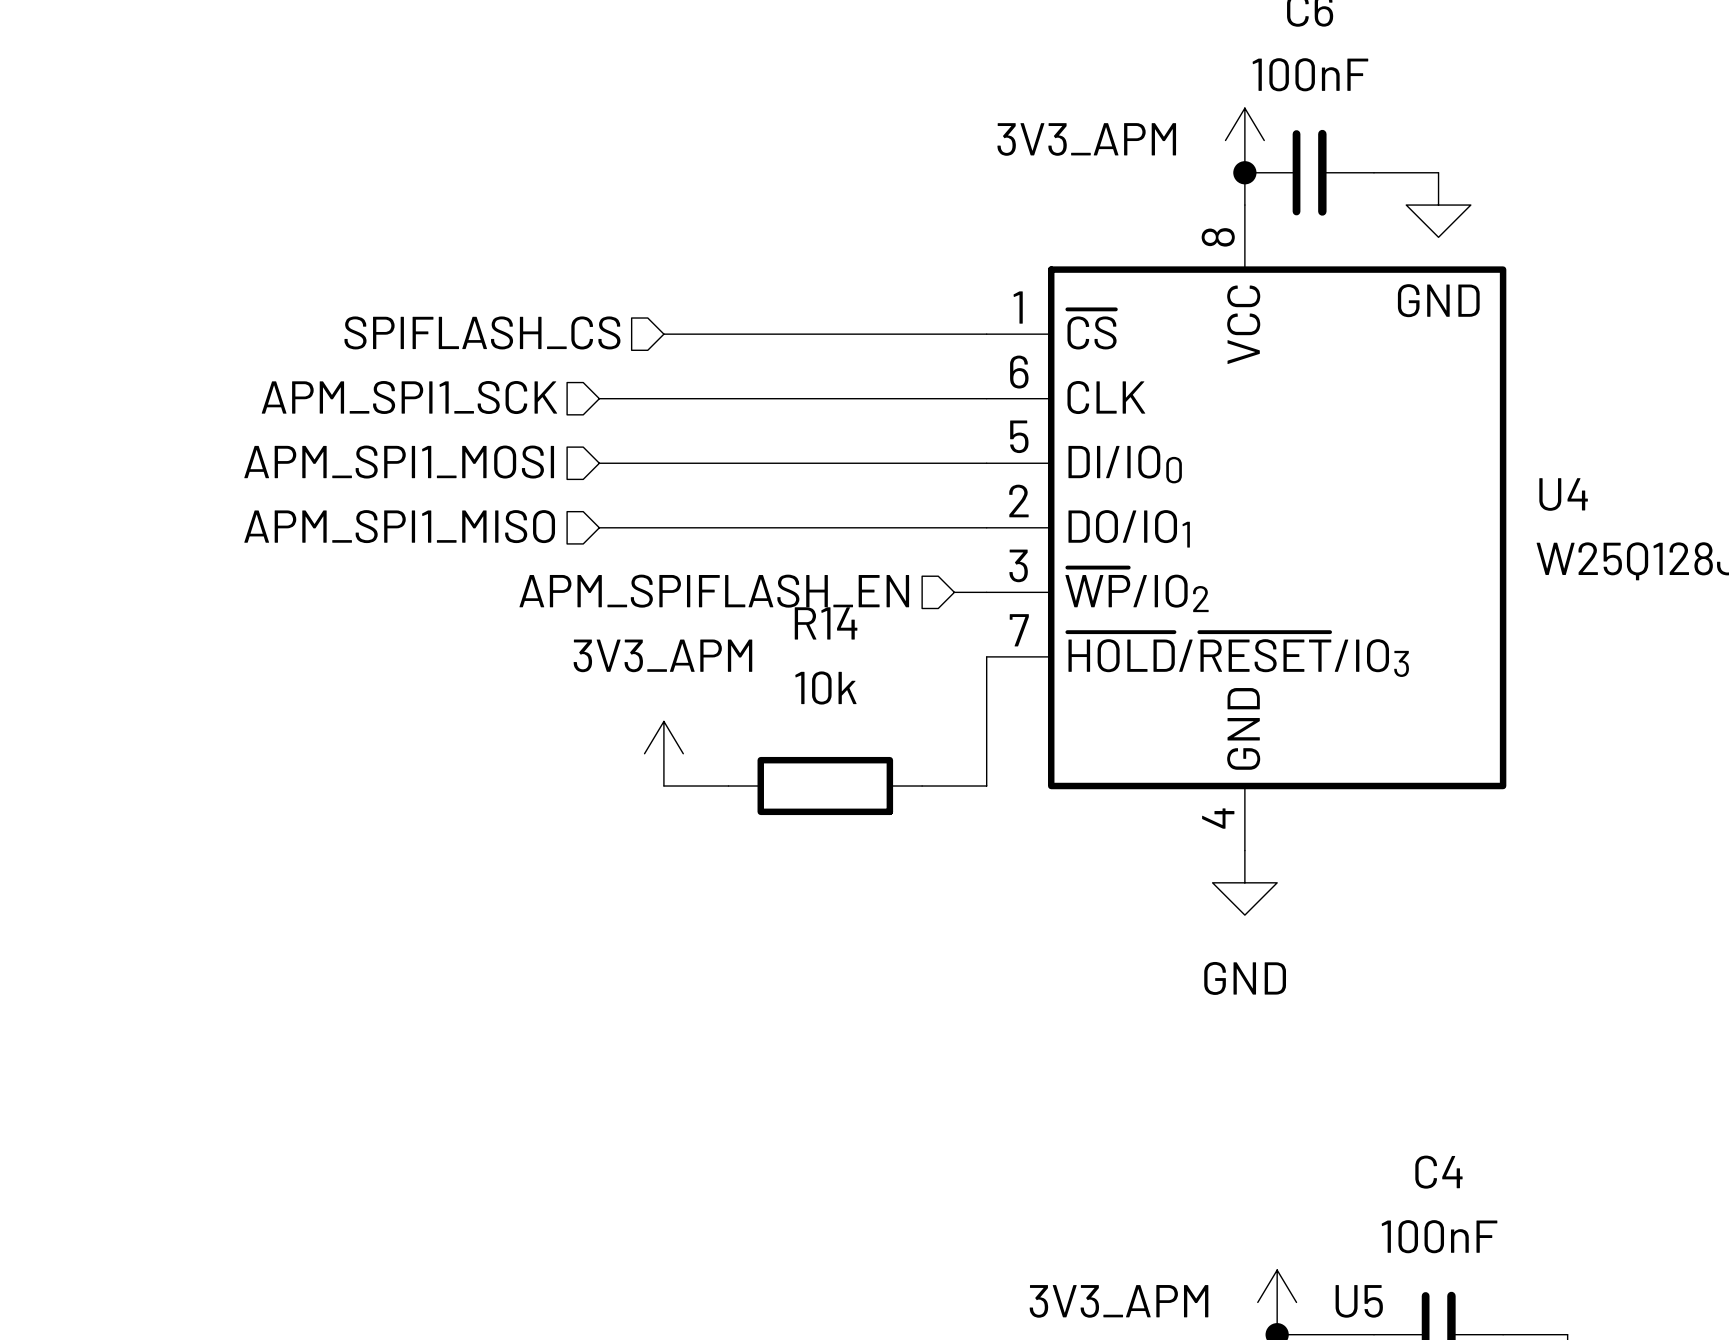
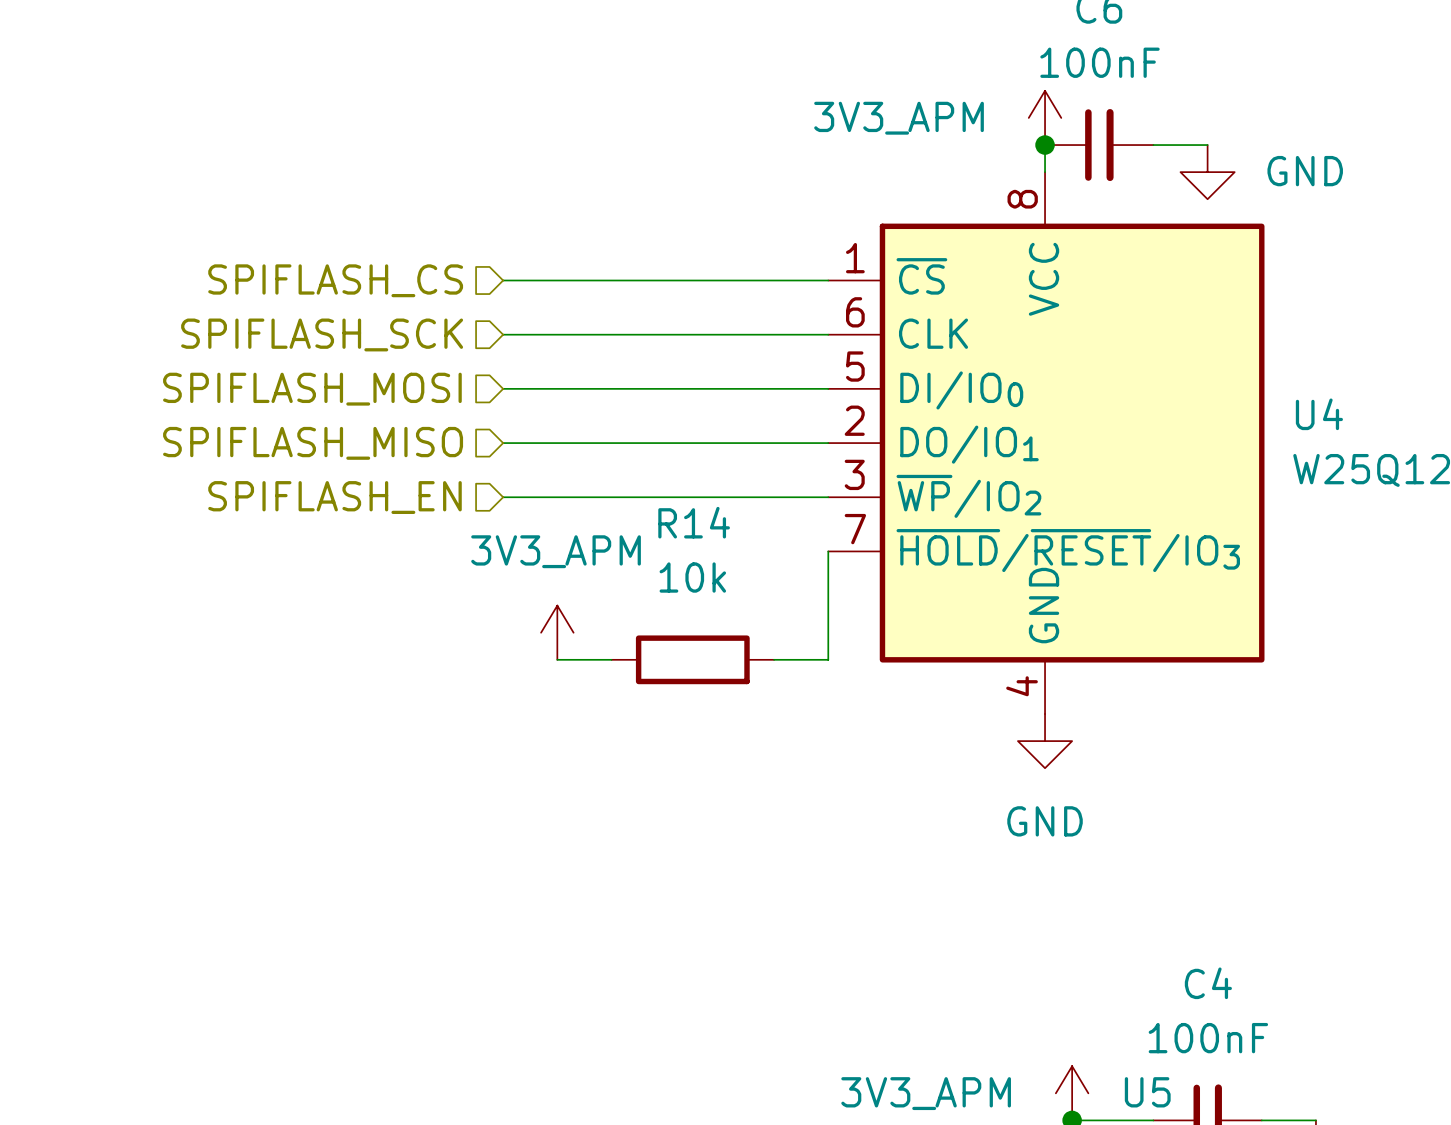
power symbol text position: GND (1438, 300) -> GND (1305, 171)
hierarchical label position: SPIFLASH_CS (482, 332) -> SPIFLASH_CS (335, 280)
wire: none -> (503, 280) (557, 280)
hierarchical label: APM_SPI1_SCK (409, 397) -> SPIFLASH_SCK (322, 334)
hierarchical label: APM_SPI1_MOSI (399, 462) -> SPIFLASH_MOSI (312, 389)
hierarchical label: APM_SPI1_MISO (399, 526) -> SPIFLASH_MISO (313, 443)
hierarchical label: APM_SPIFLASH_EN (714, 591) -> SPIFLASH_EN (335, 497)
wire: none -> (503, 497) (801, 497)

